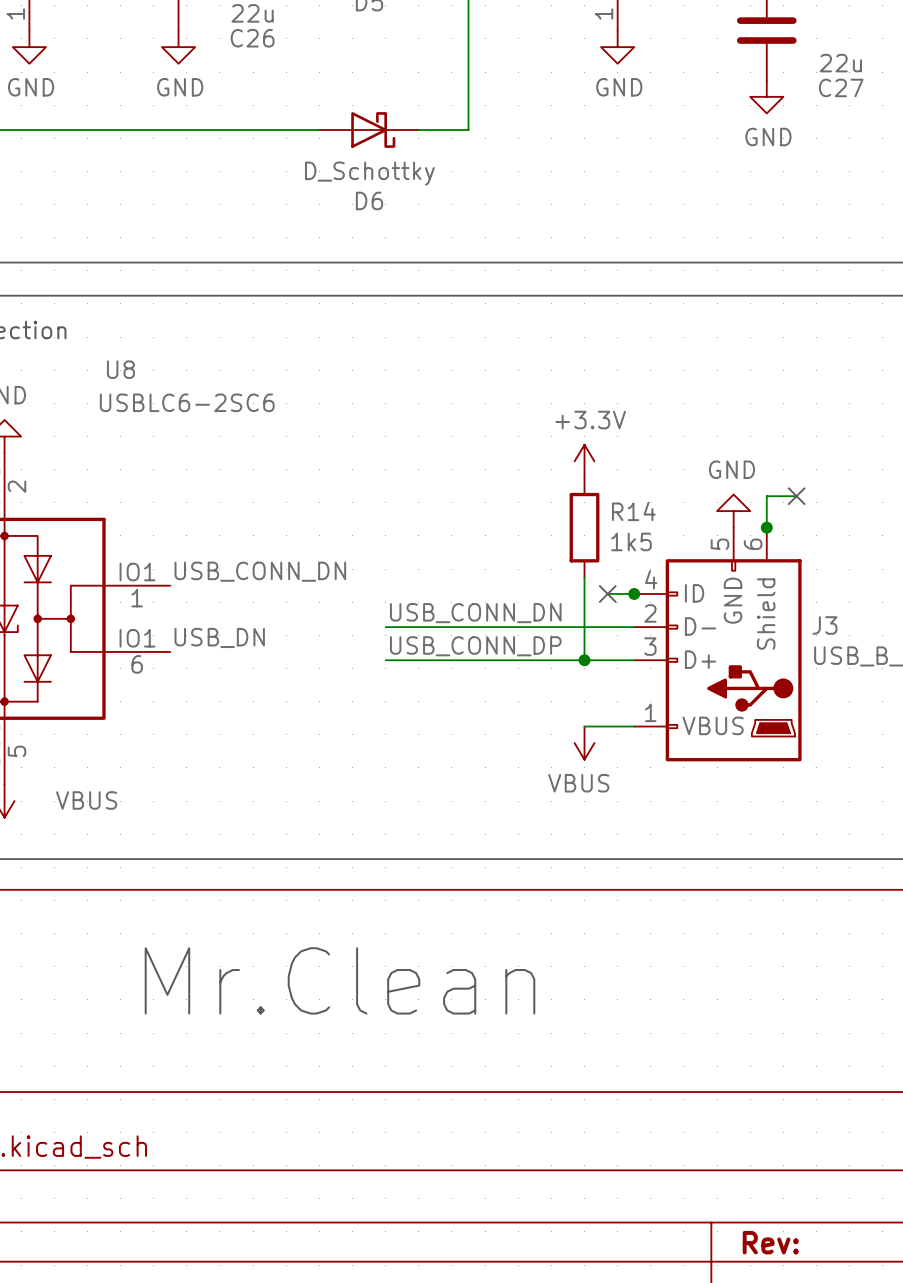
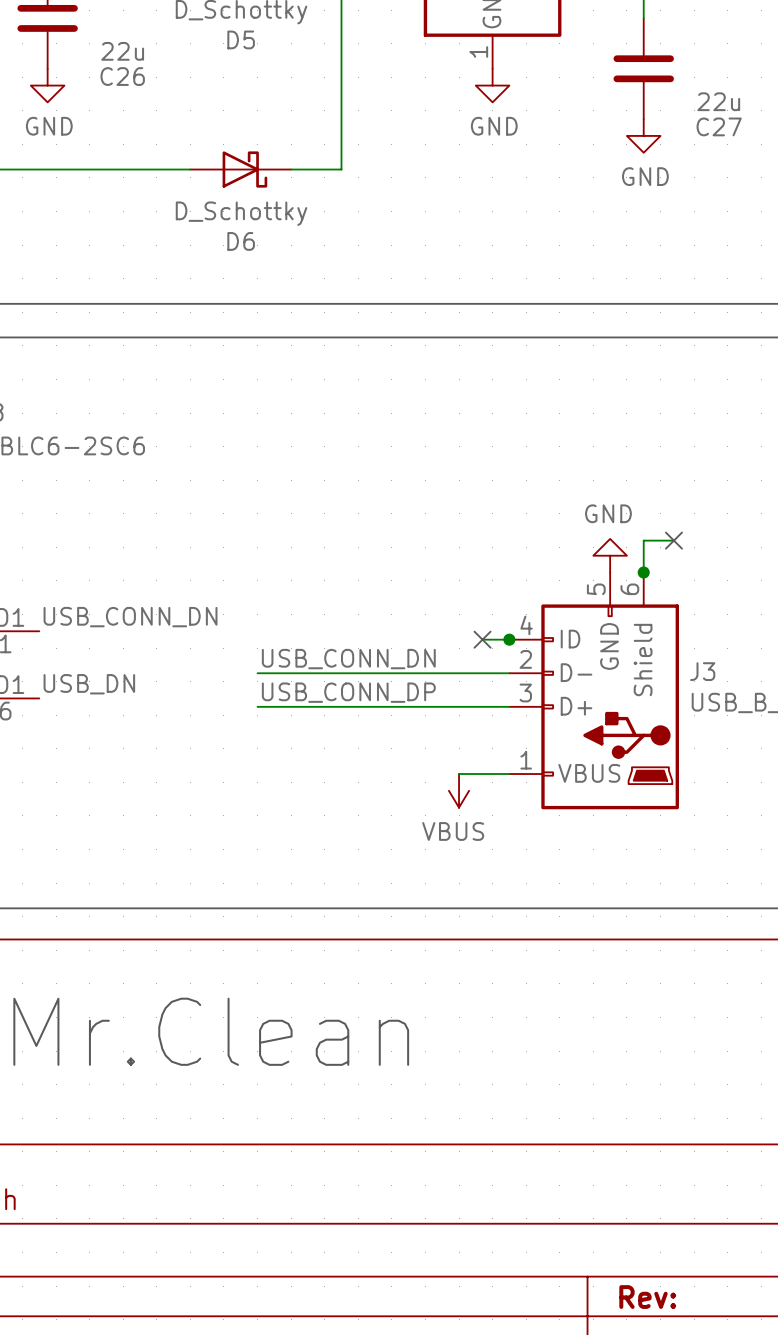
power symbol: +3.3V (584, 461) -> none
R14: 1k5 (584, 527) -> none
wire: (584, 577) (584, 660) -> none
junction: (584, 660) -> none

